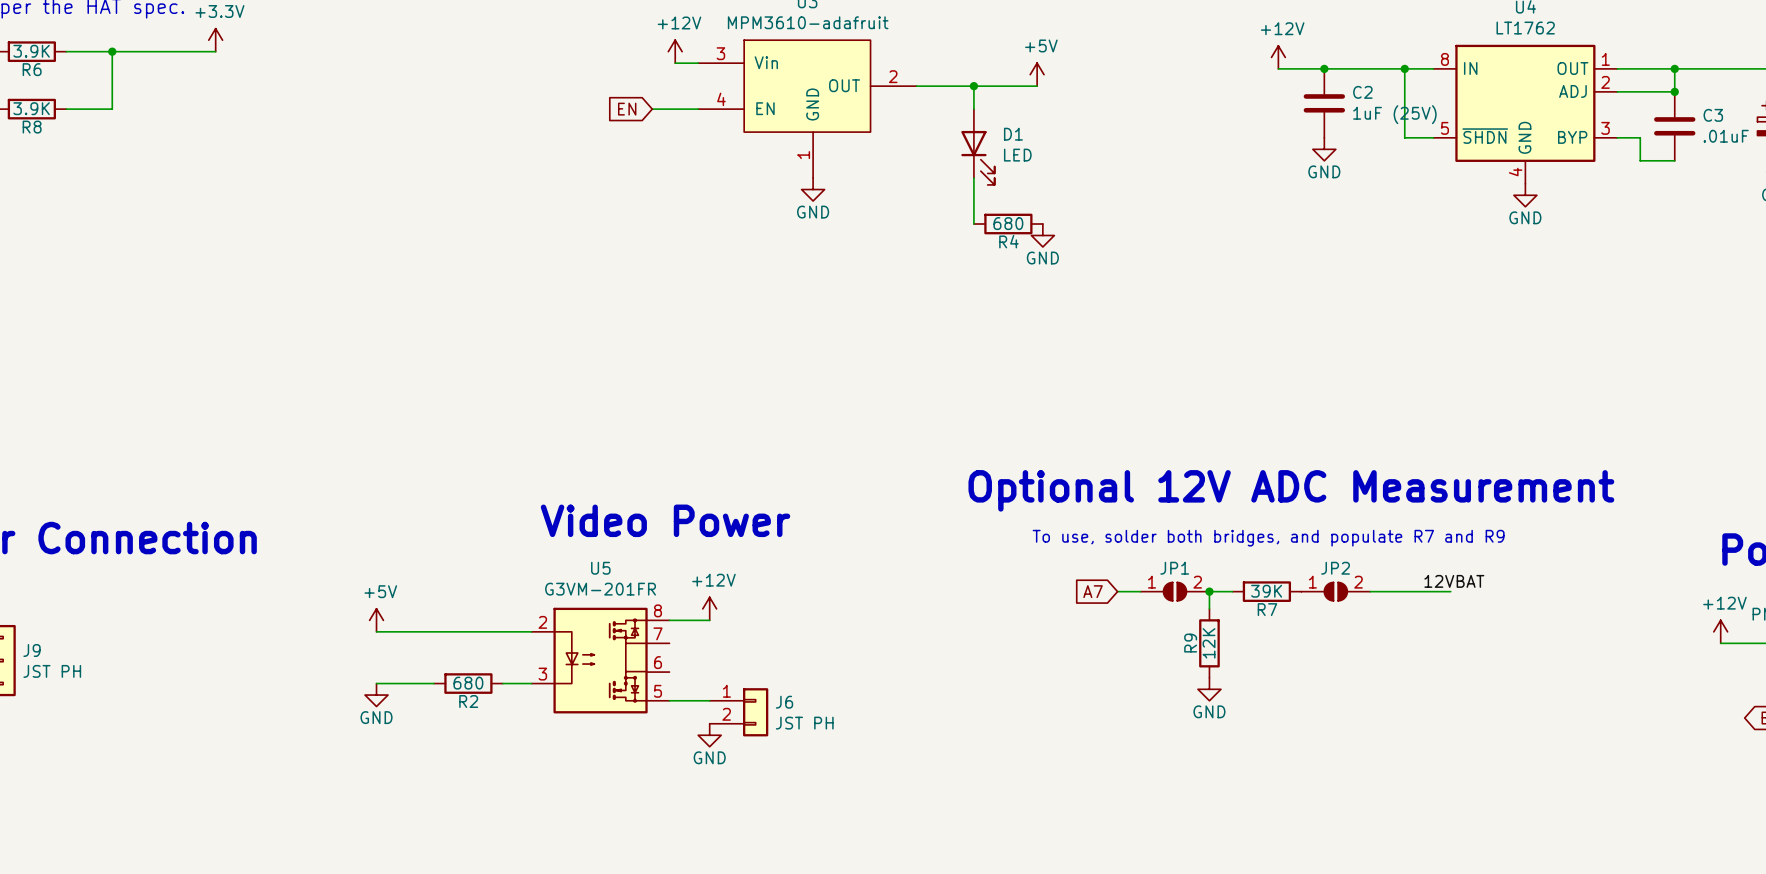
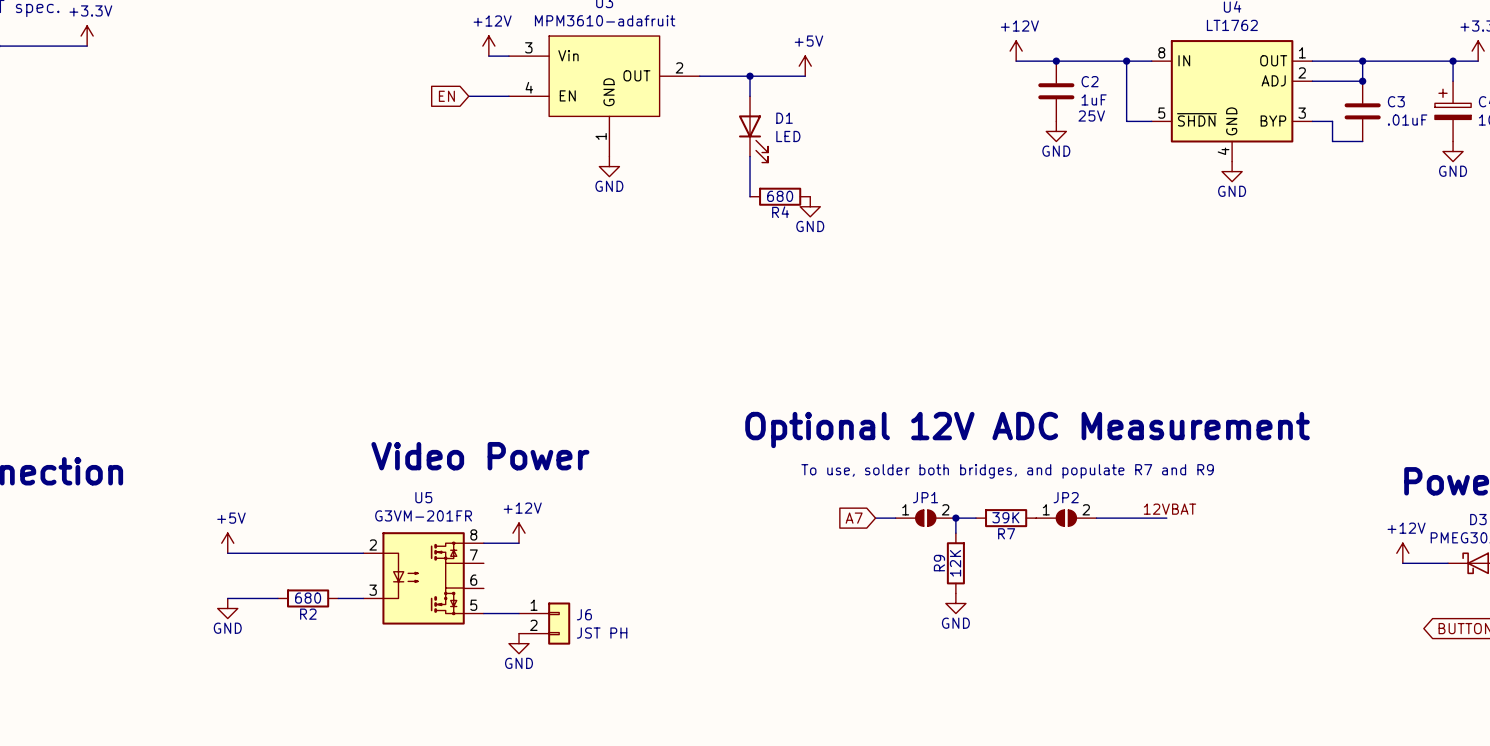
C2 value: 1uF (25V) (1394, 114) -> 1uF (1094, 99)
C2 text: none -> 25V (1091, 116)

